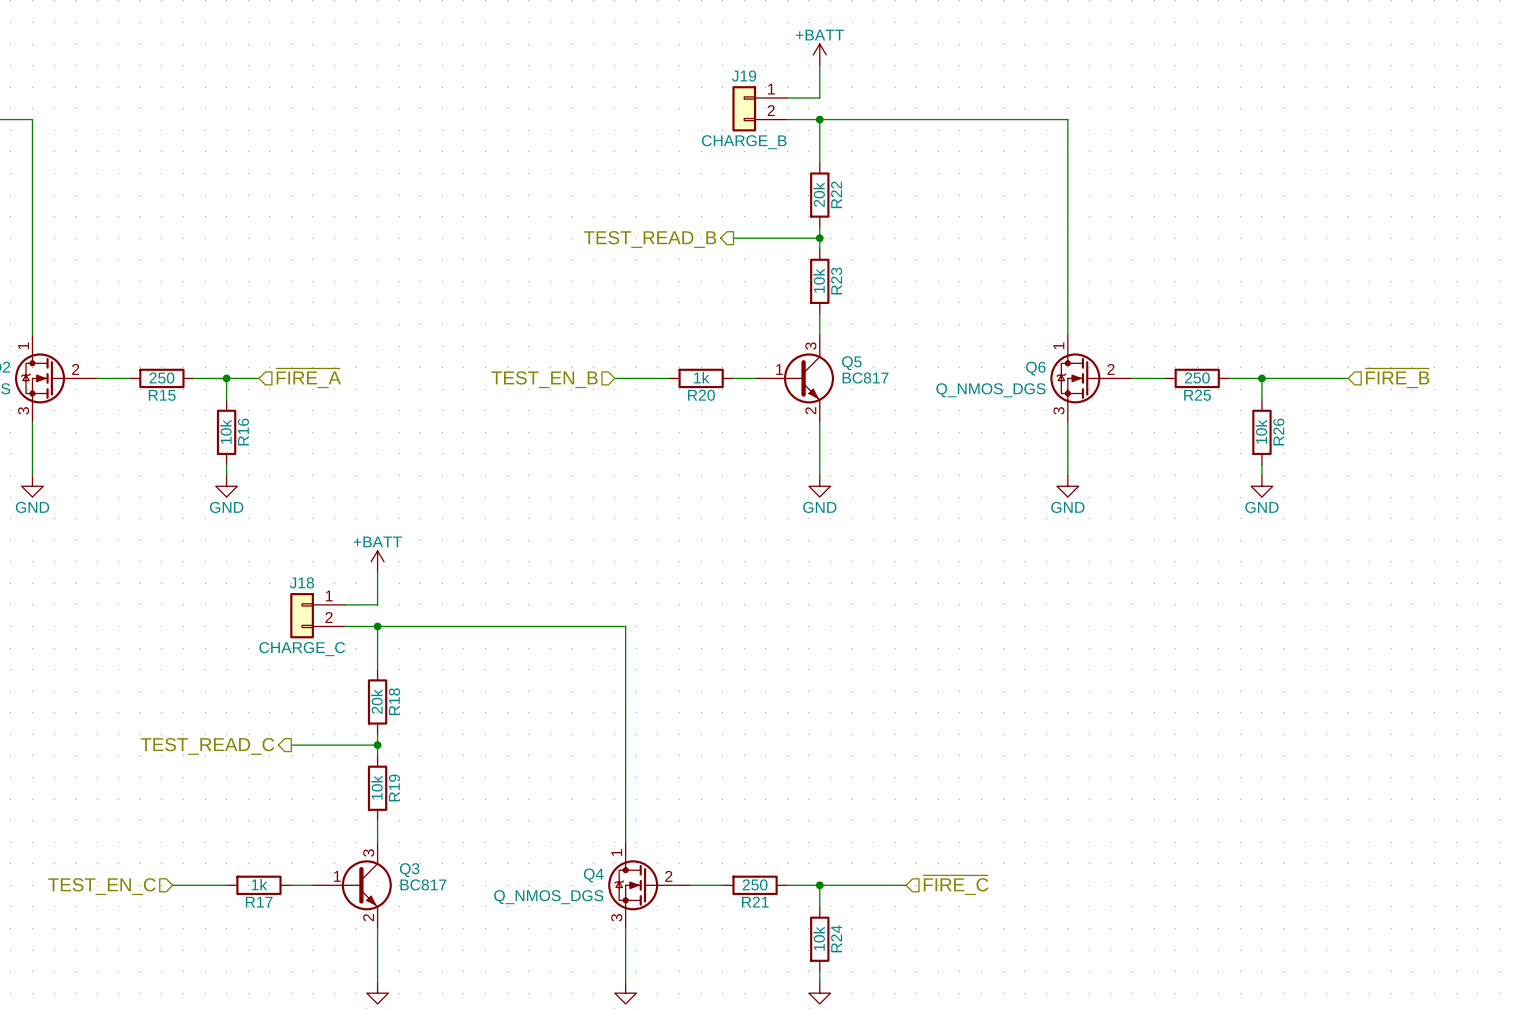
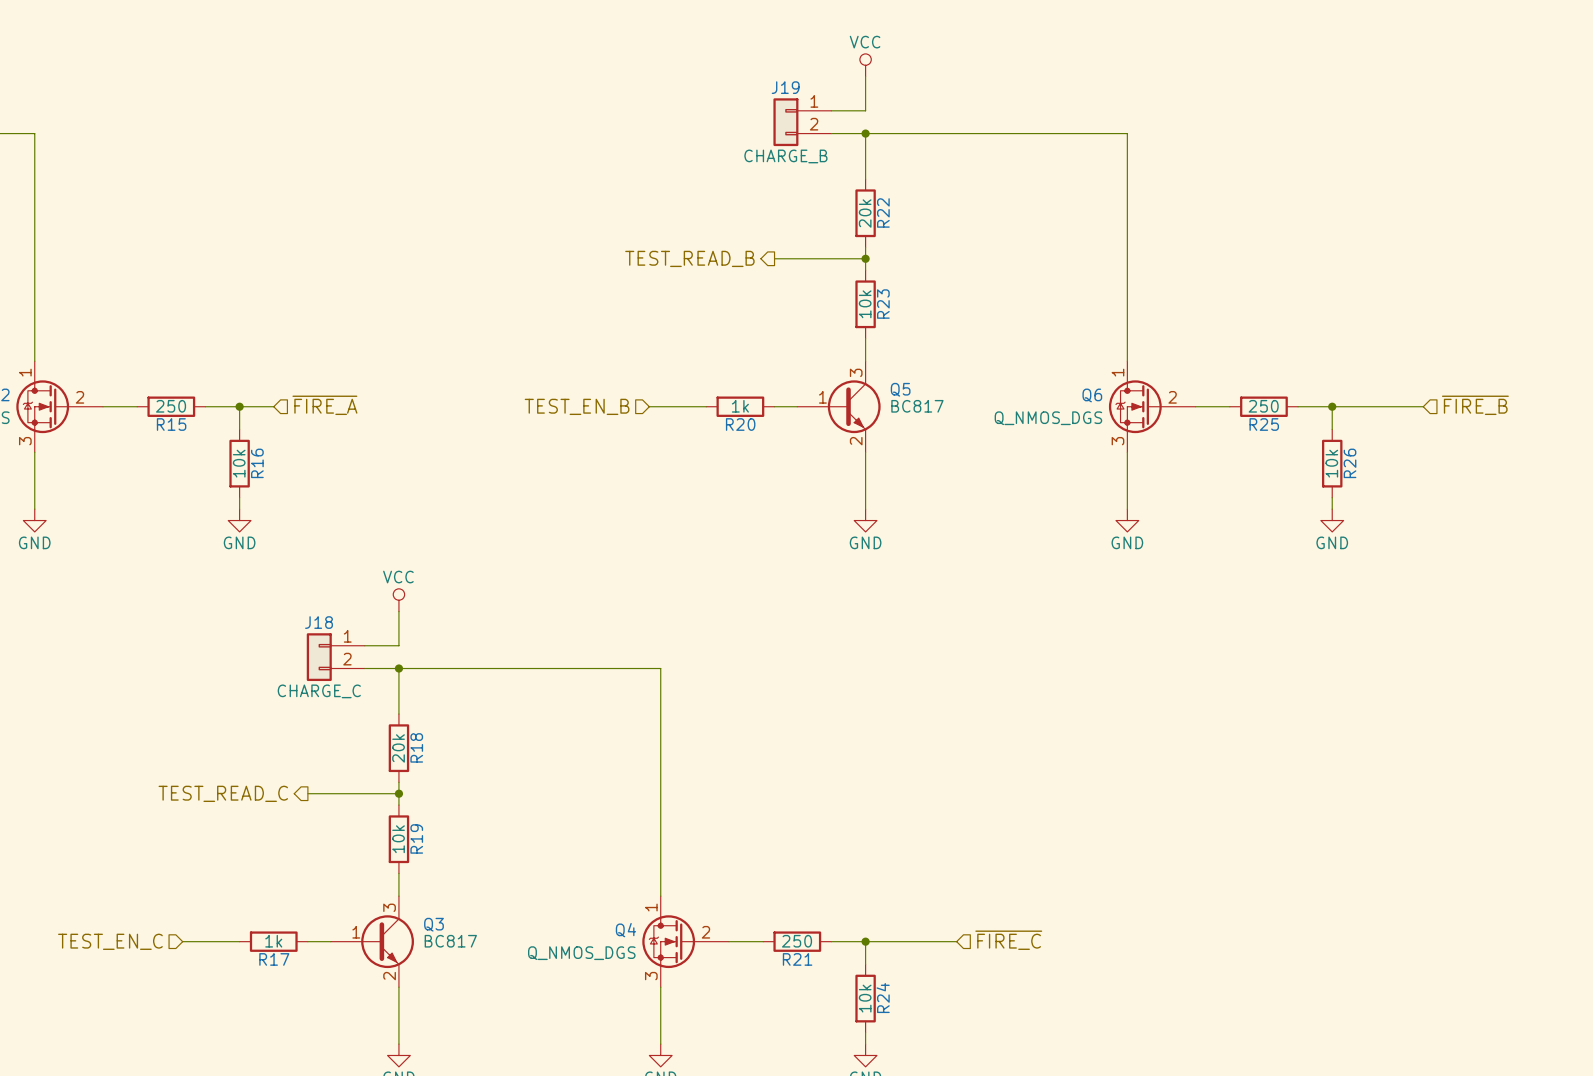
power symbol: +BATT (819, 54) -> VCC (865, 65)
power symbol: +BATT (377, 561) -> VCC (398, 600)

